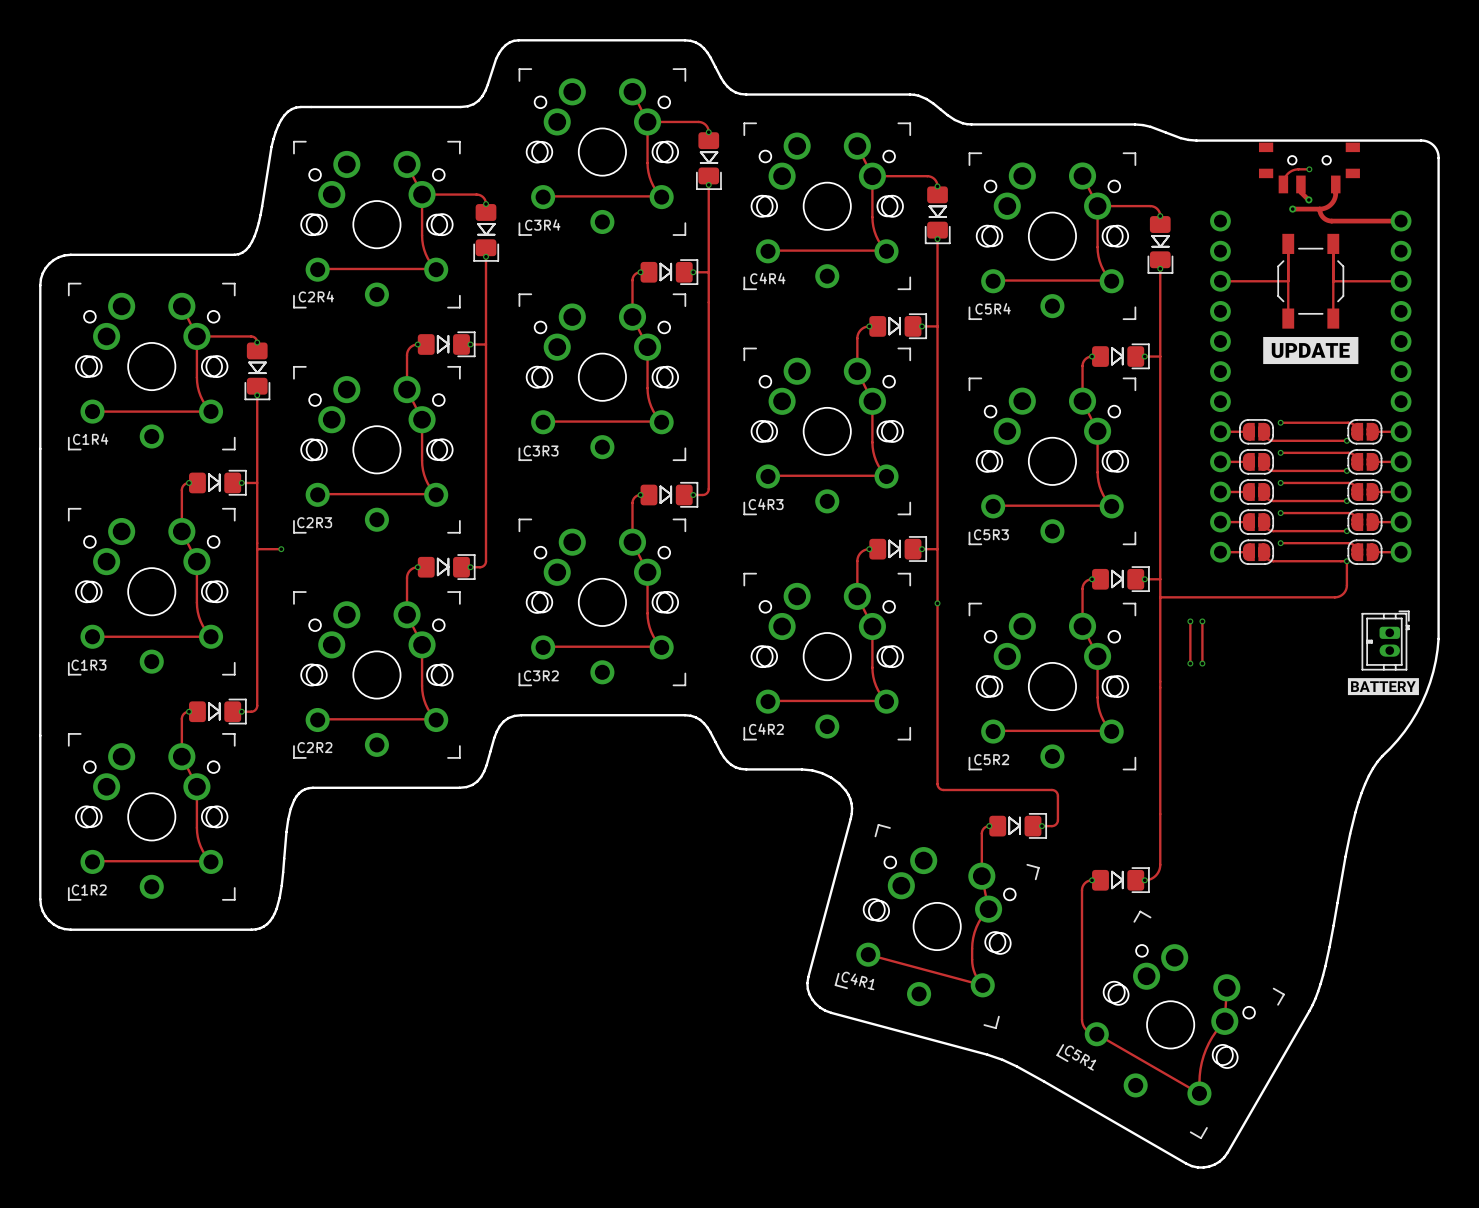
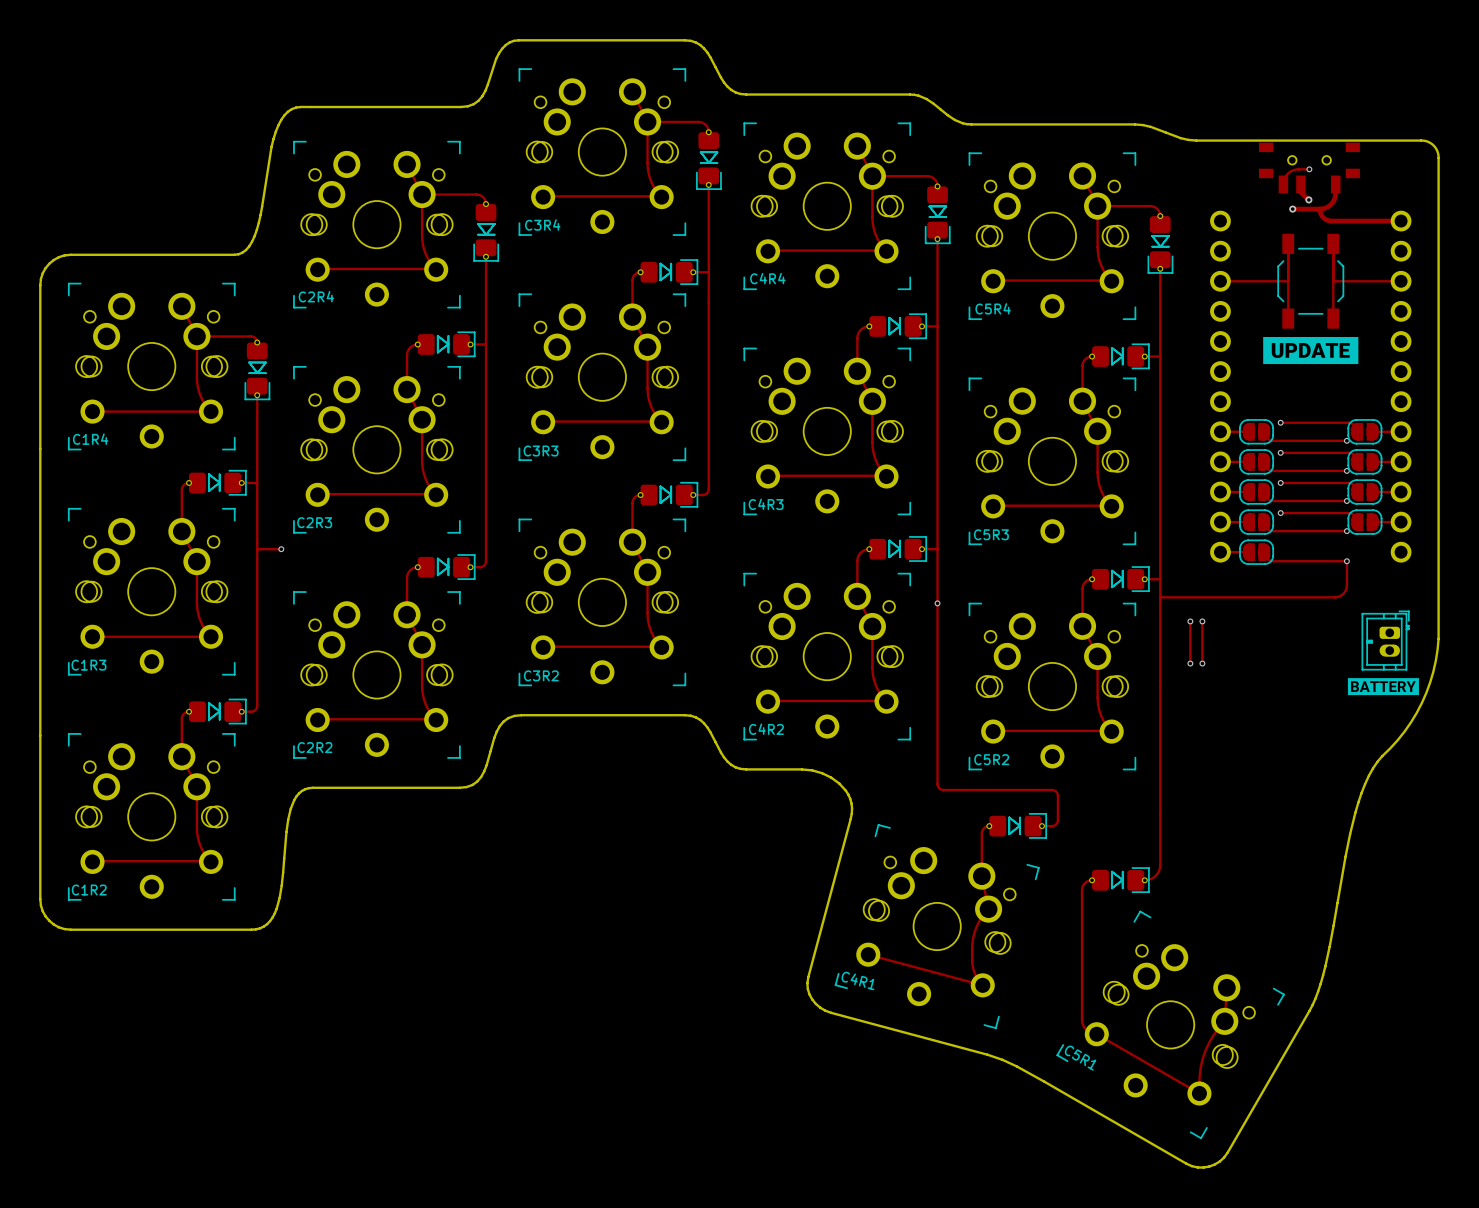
track: (1280, 543) (1349, 543) (1355, 546) (1357, 552) -> none
via: (1280, 543) -> none
part: (1364, 552) -> none
track: (1372, 552) (1401, 552) -> none

